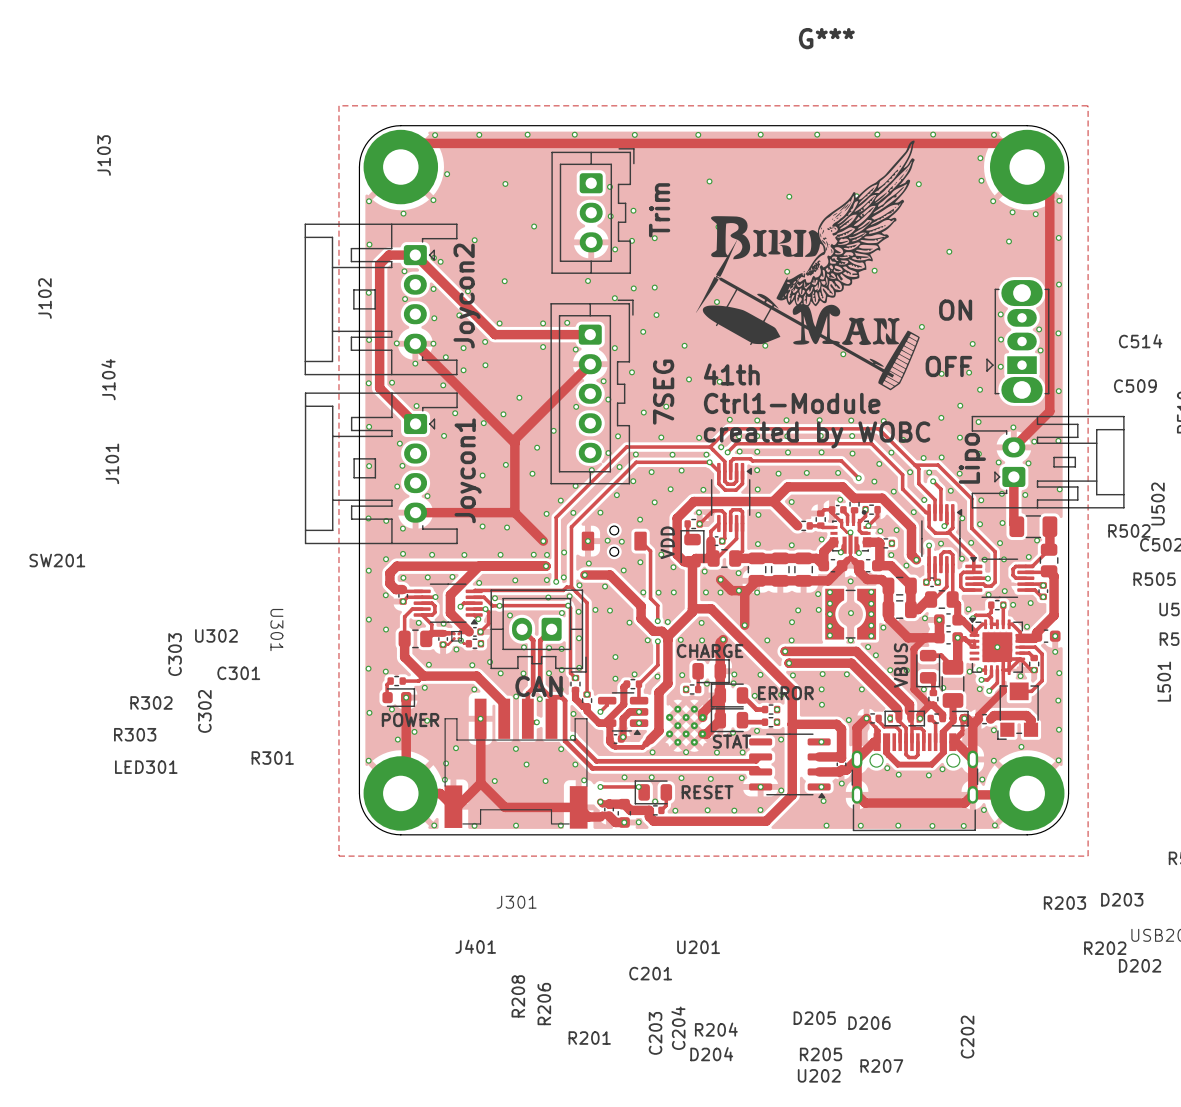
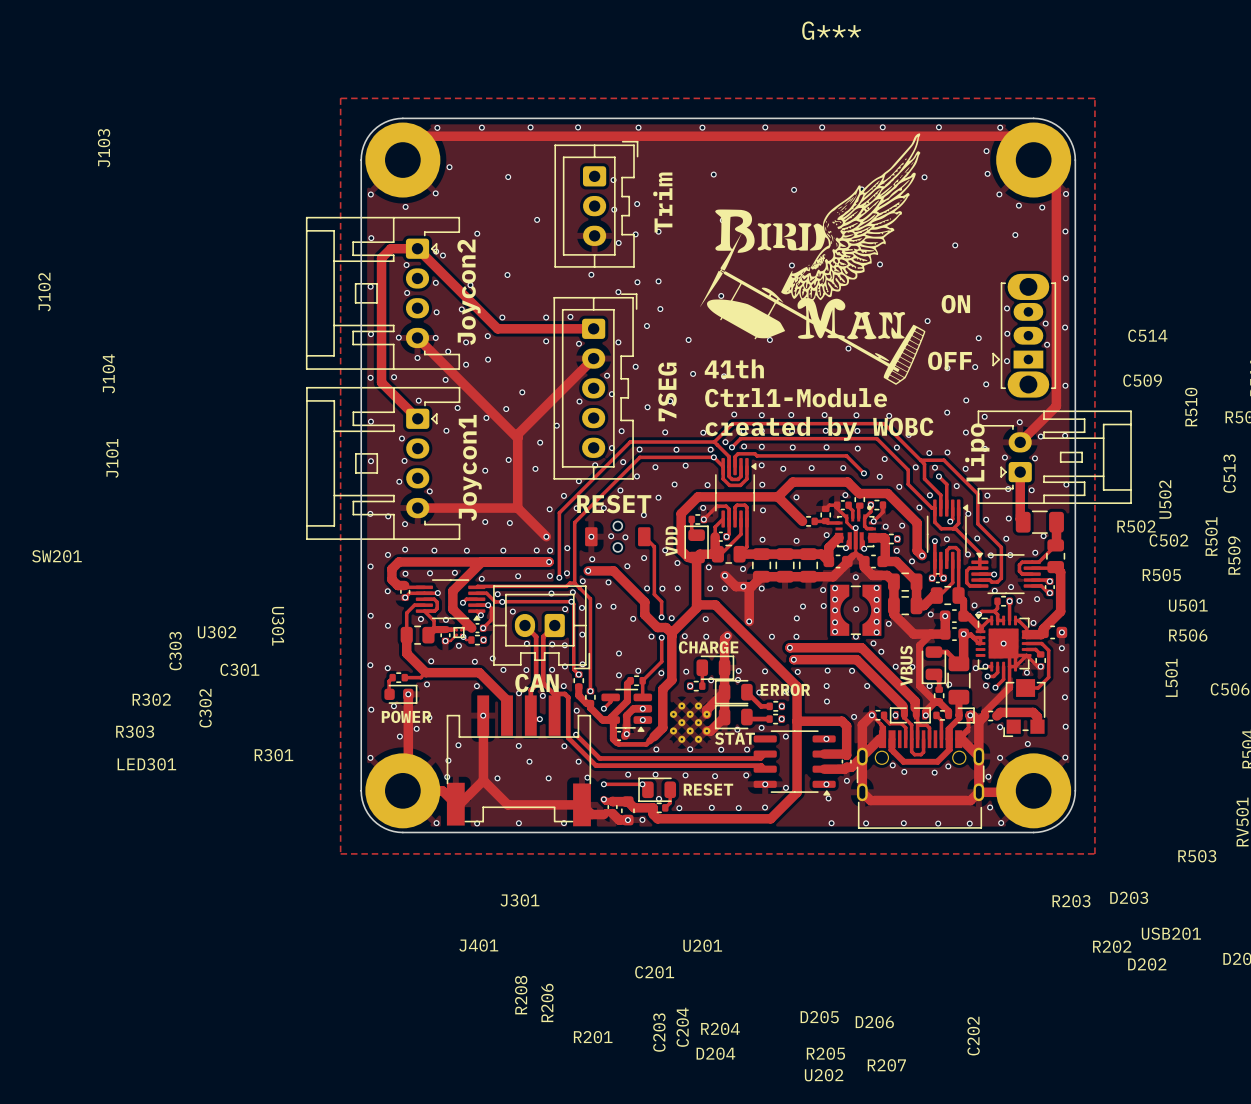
text: none -> RESET (614, 504)

